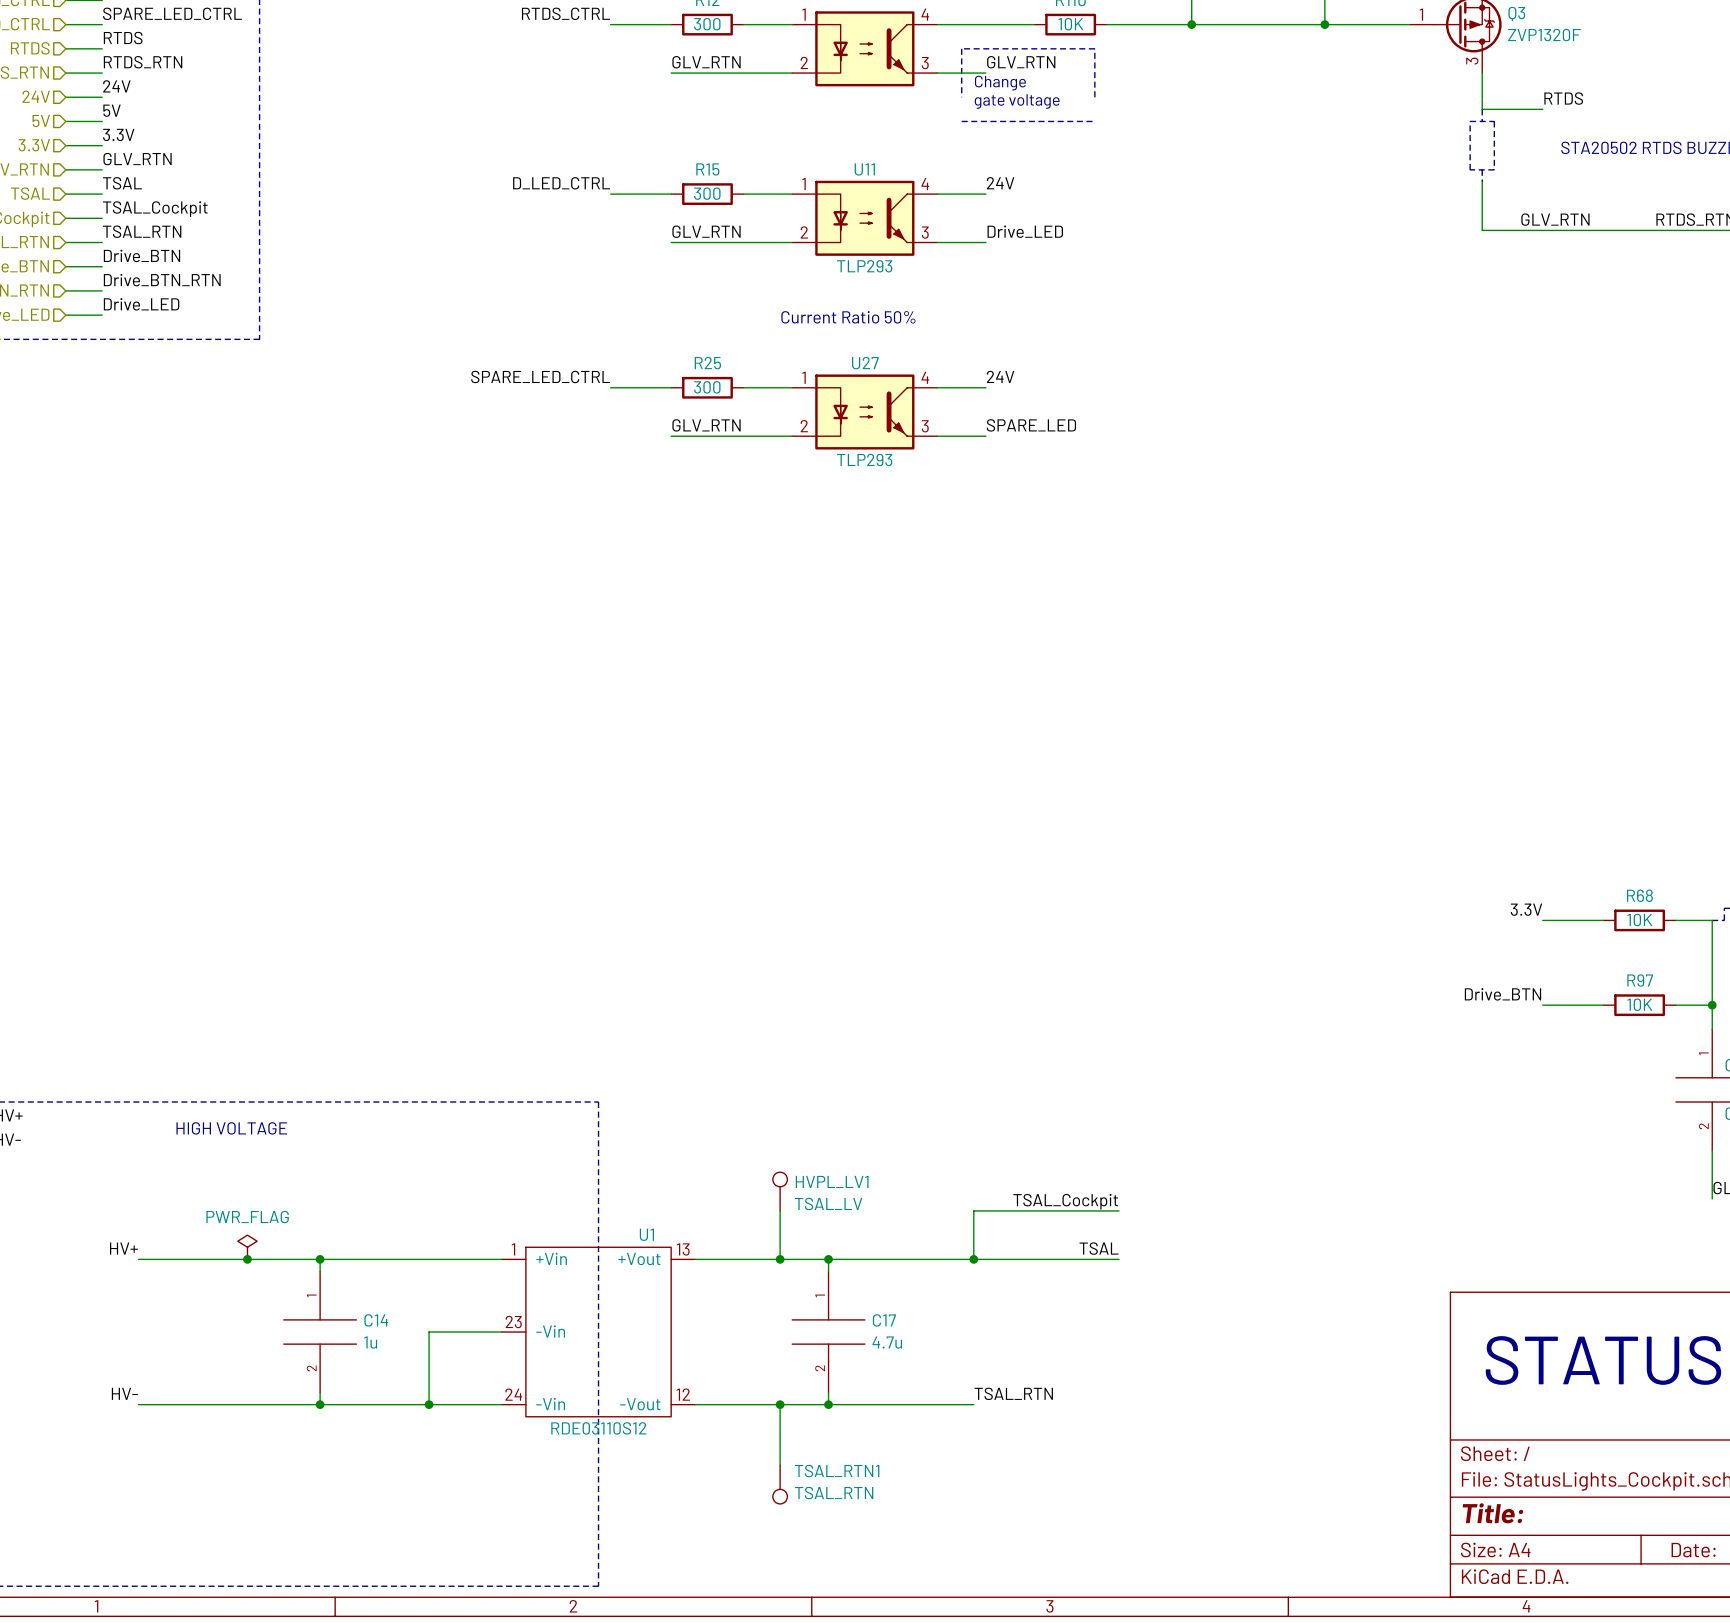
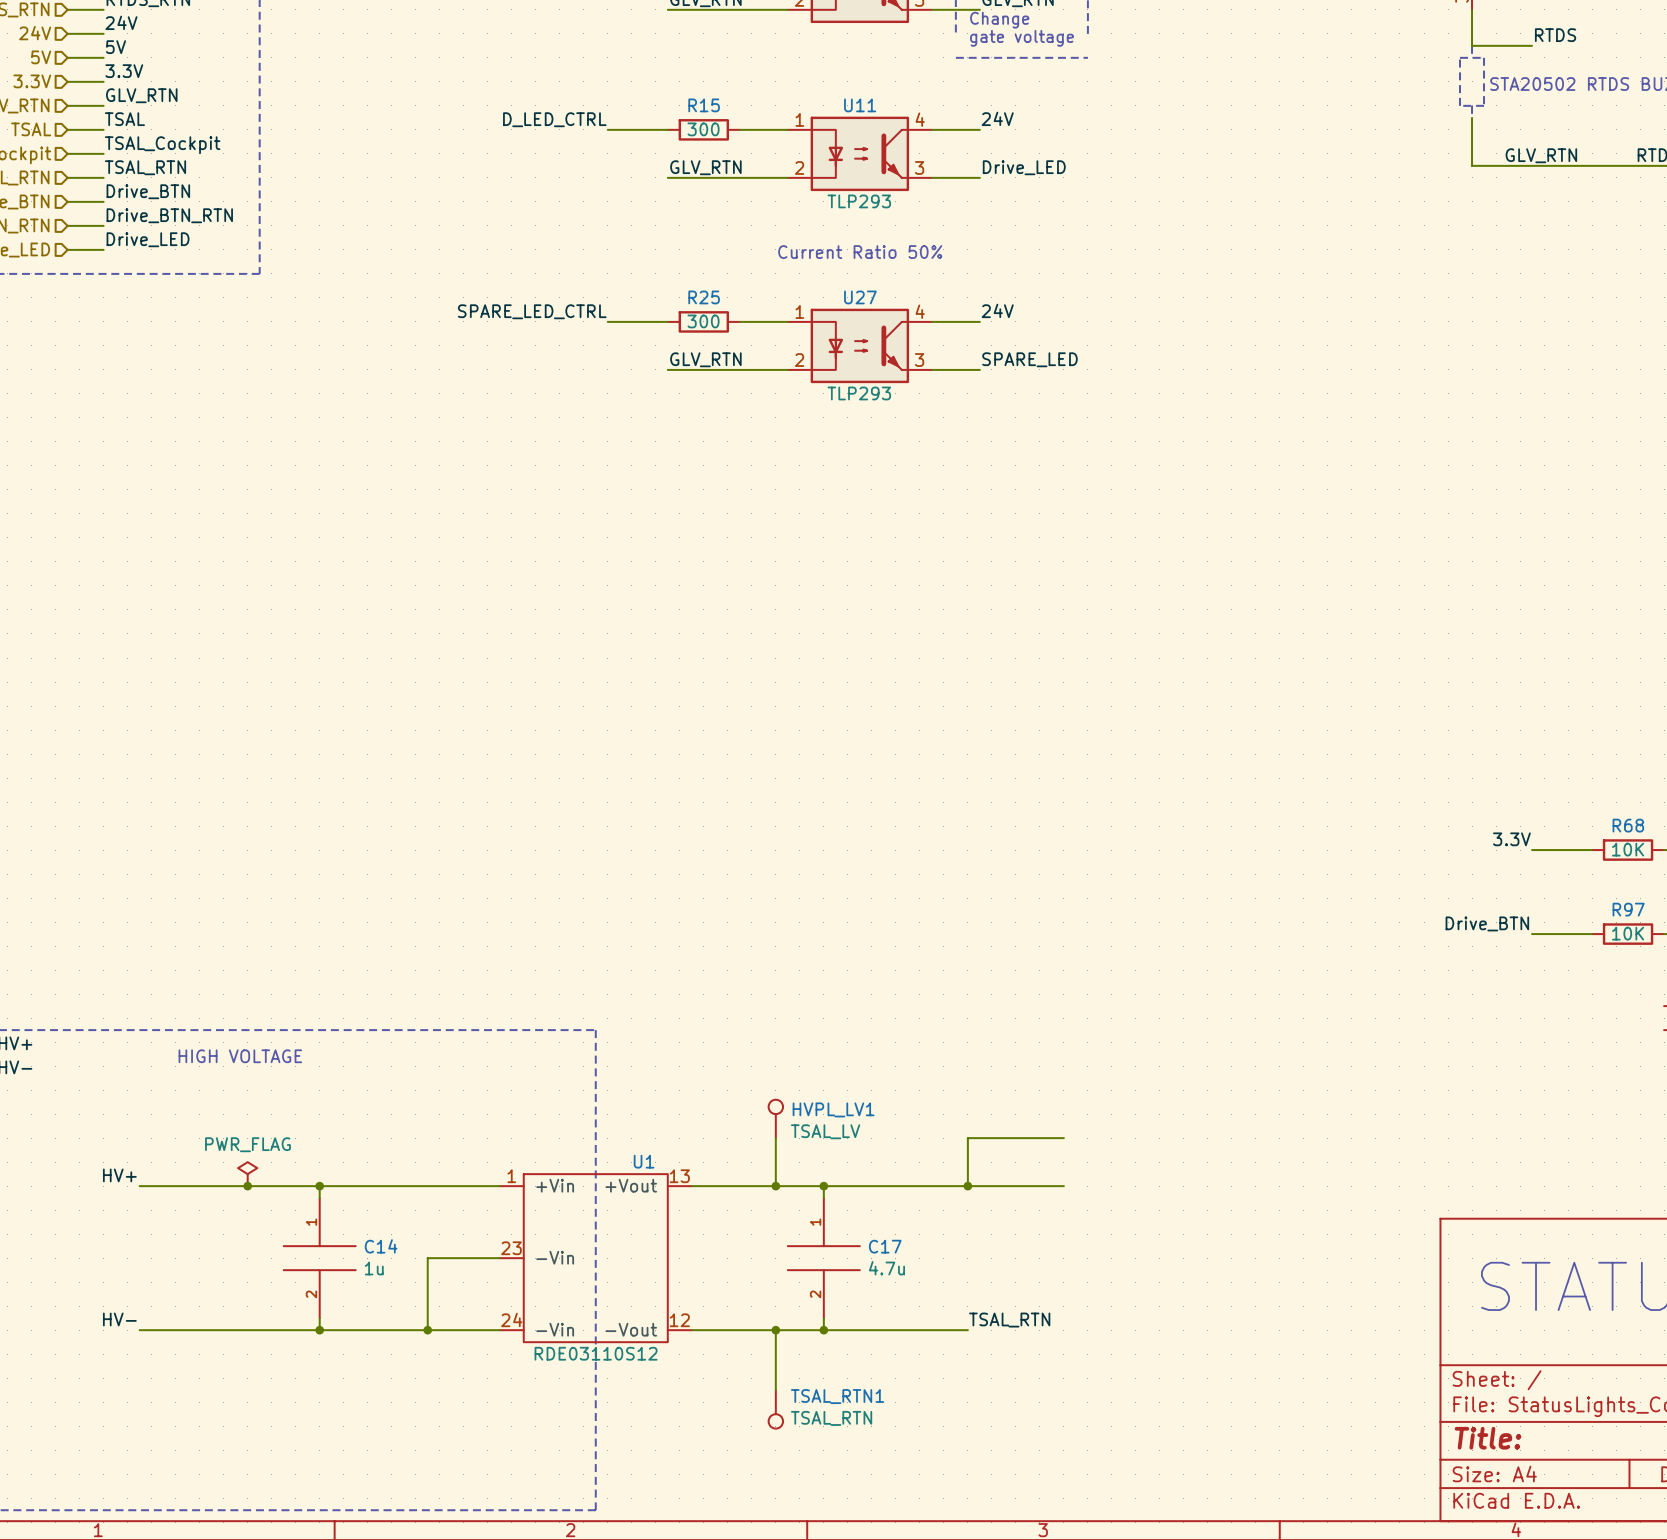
label: TSAL_Cockpit (1065, 1201) -> none
wire: (1070, 1210) (1119, 1210) -> none
label: TSAL (1099, 1248) -> none
wire: (1070, 1259) (1119, 1259) -> none

